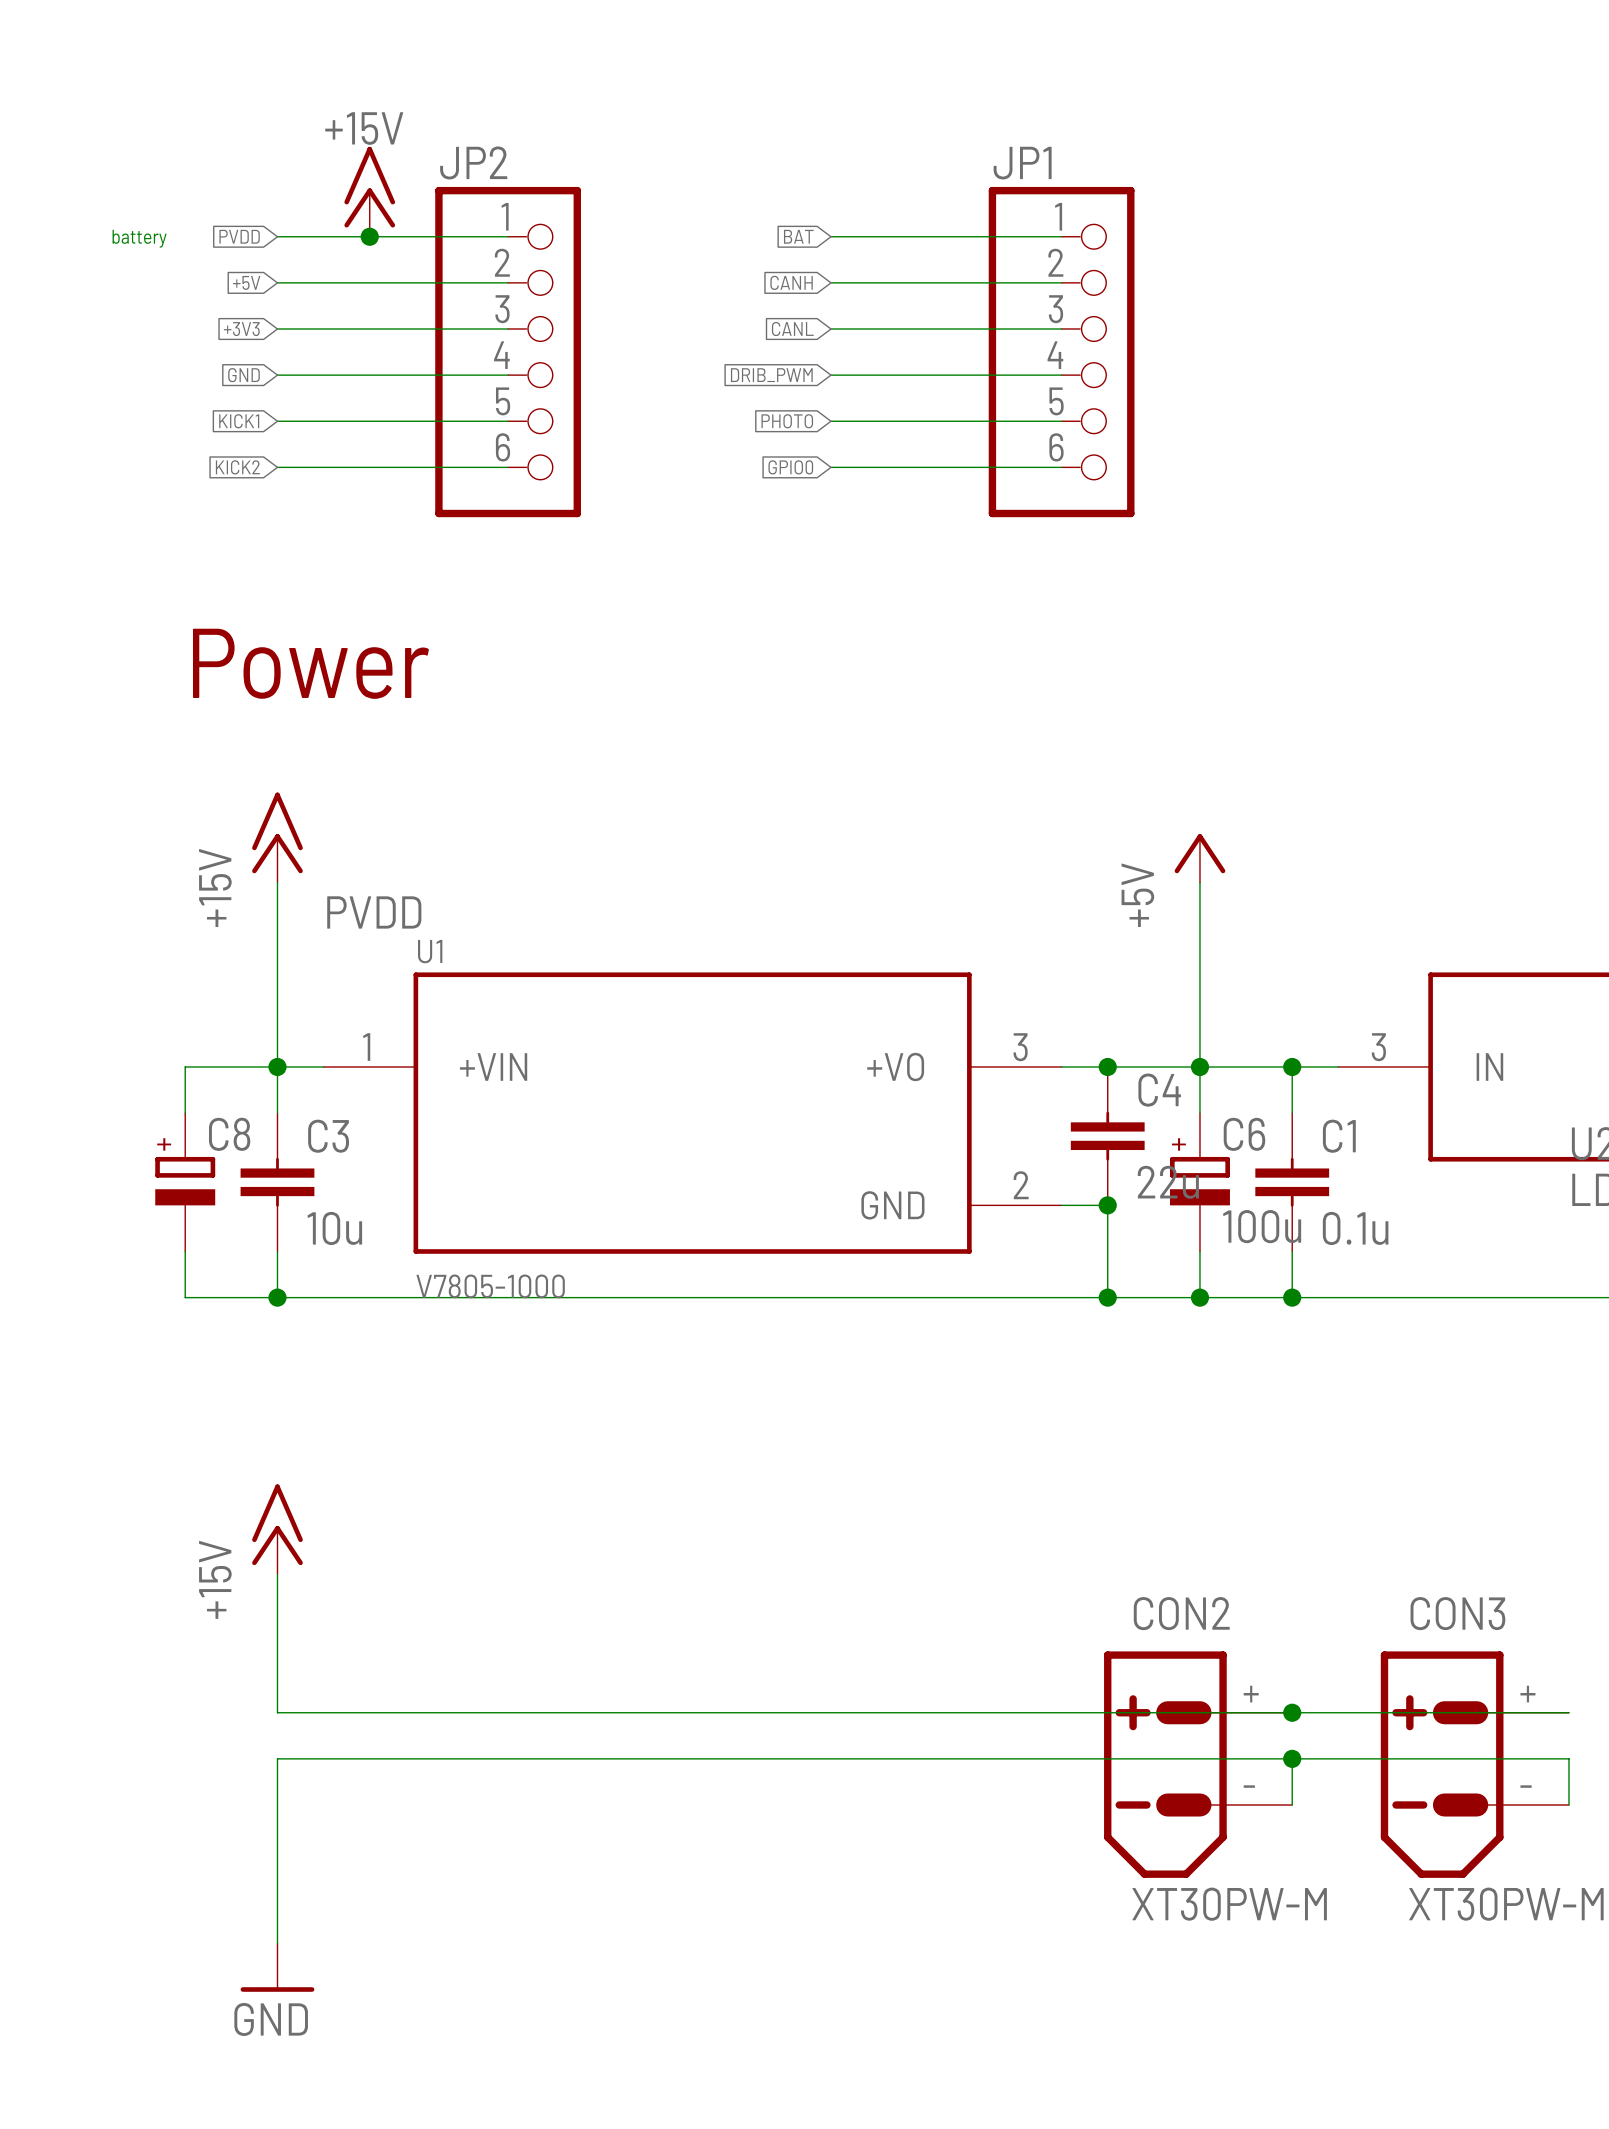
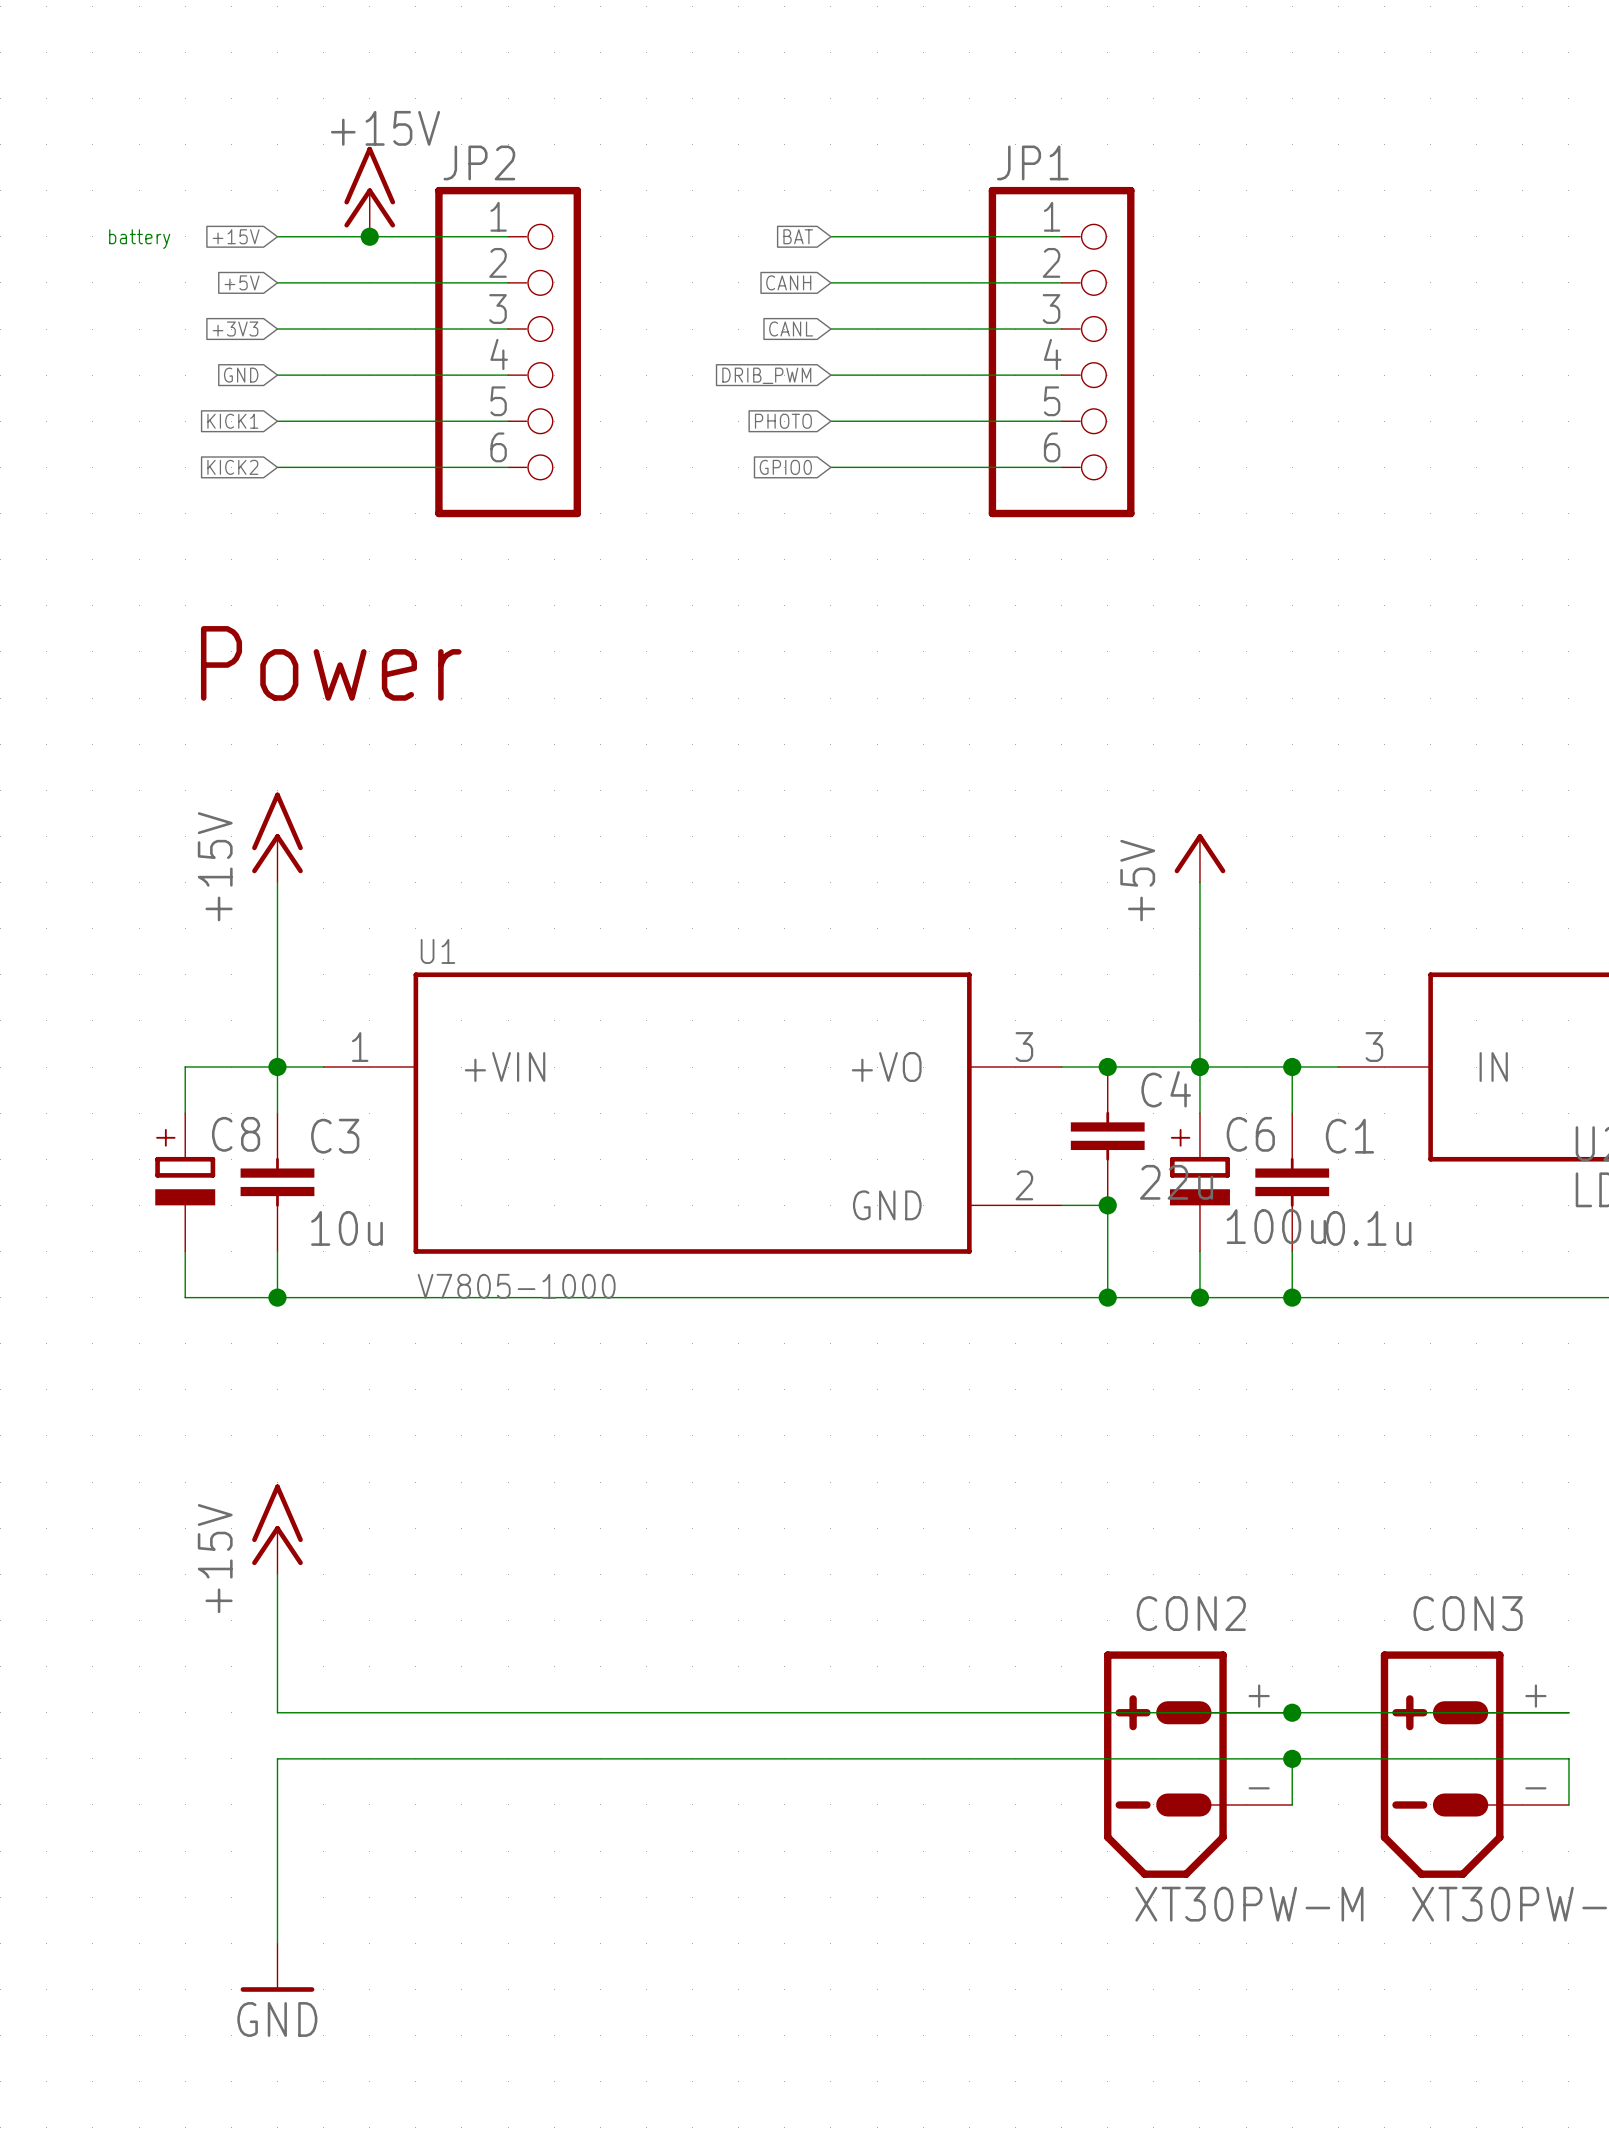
global label: PVDD (239, 236) -> +15V (236, 236)
label: PVDD (374, 912) -> none

